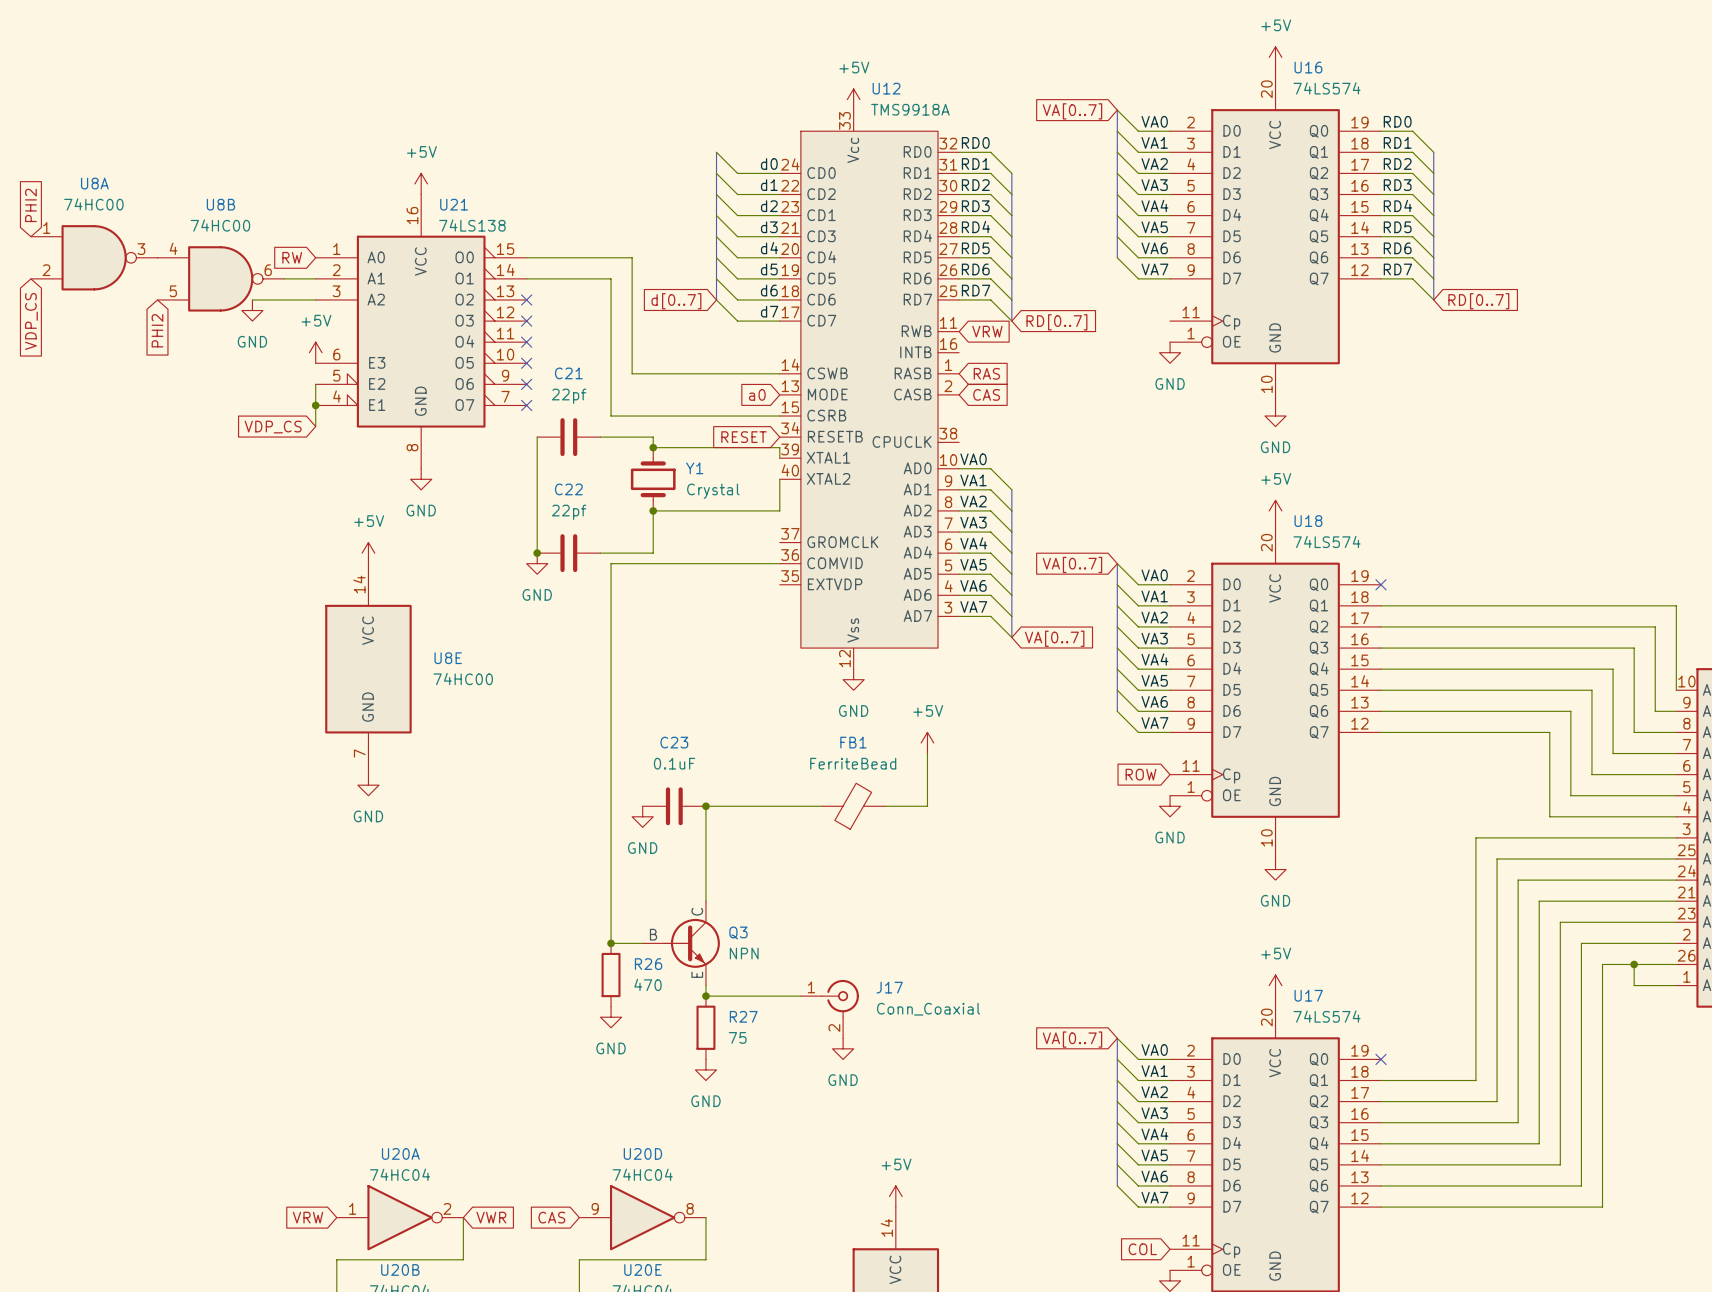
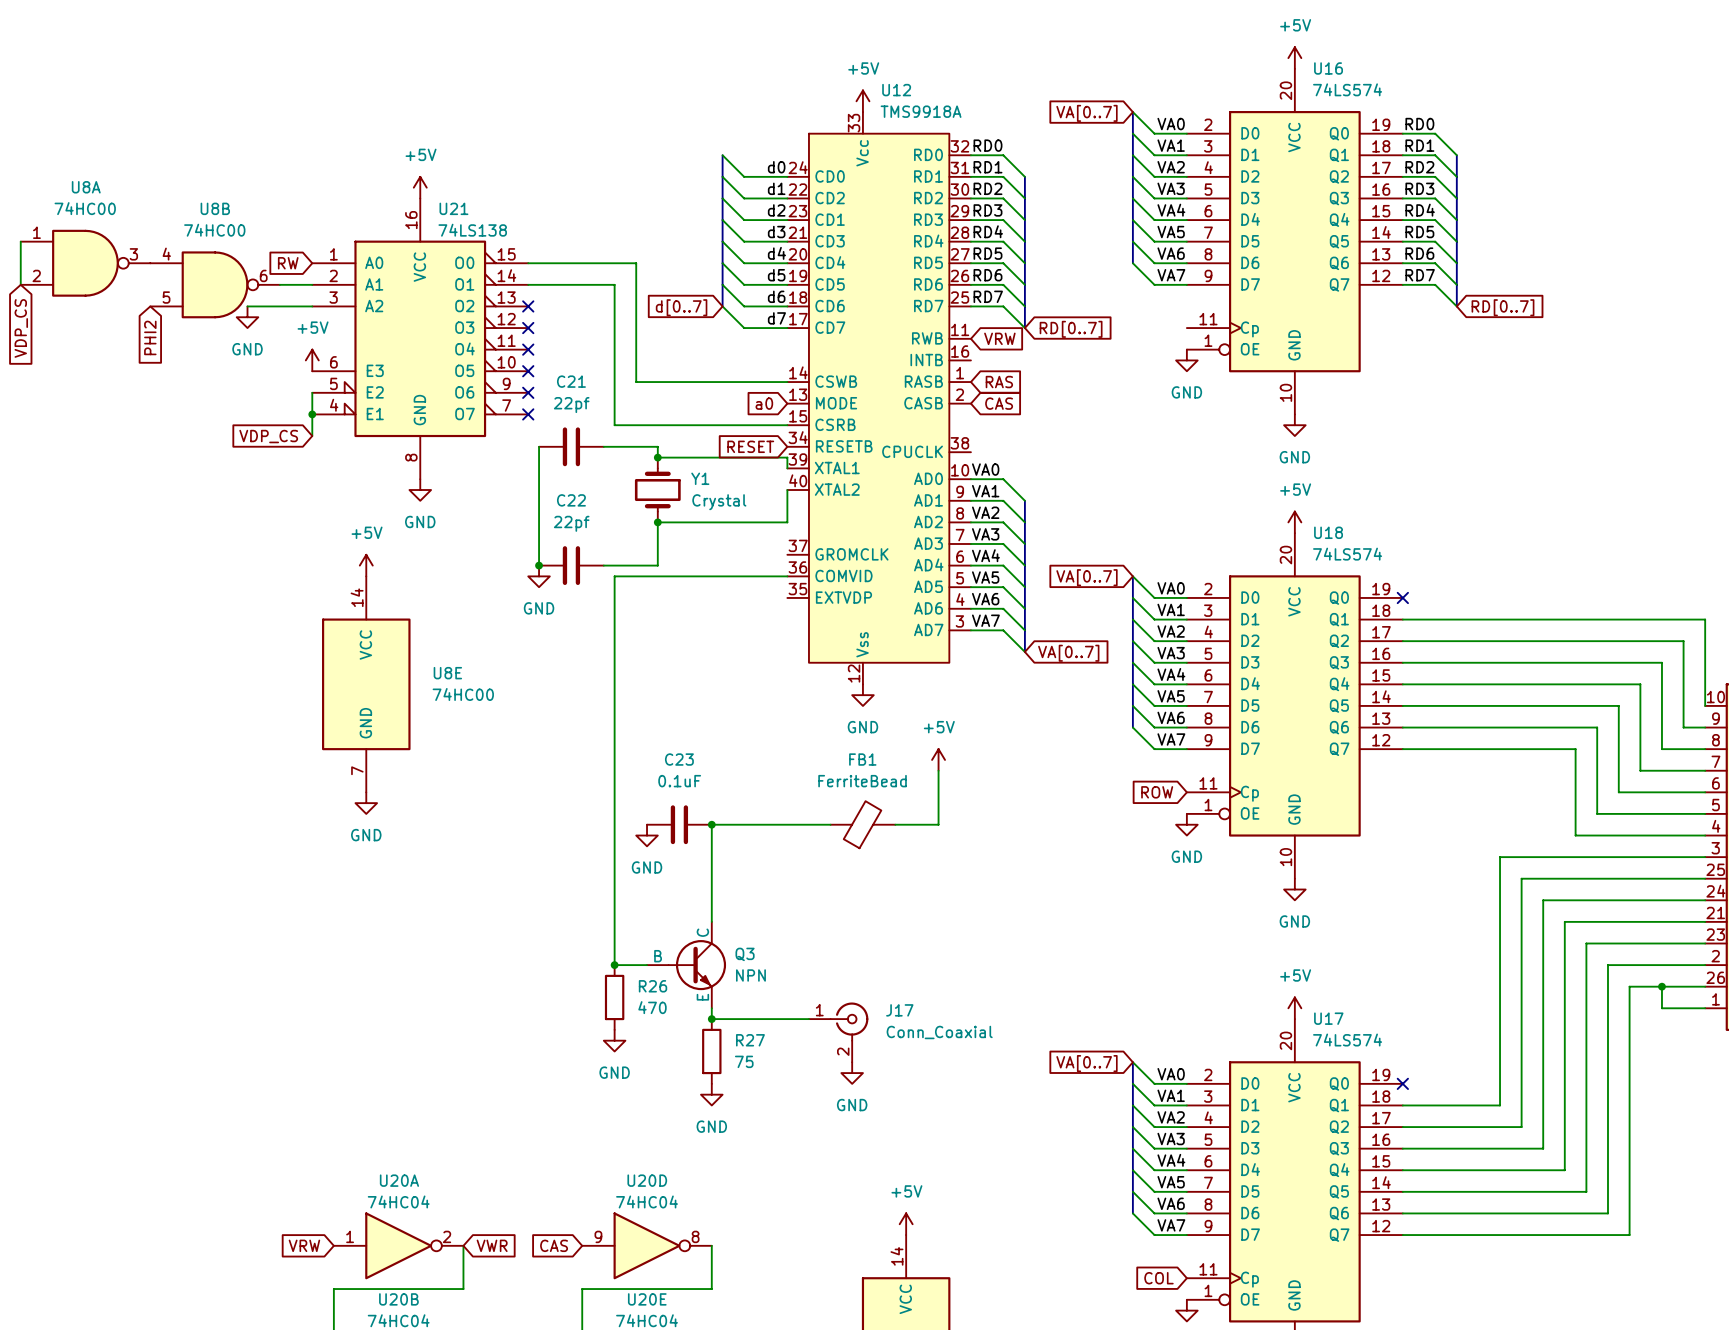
global label: PHI2 (30, 205) -> none
wire: none -> (20, 241) (20, 284)

